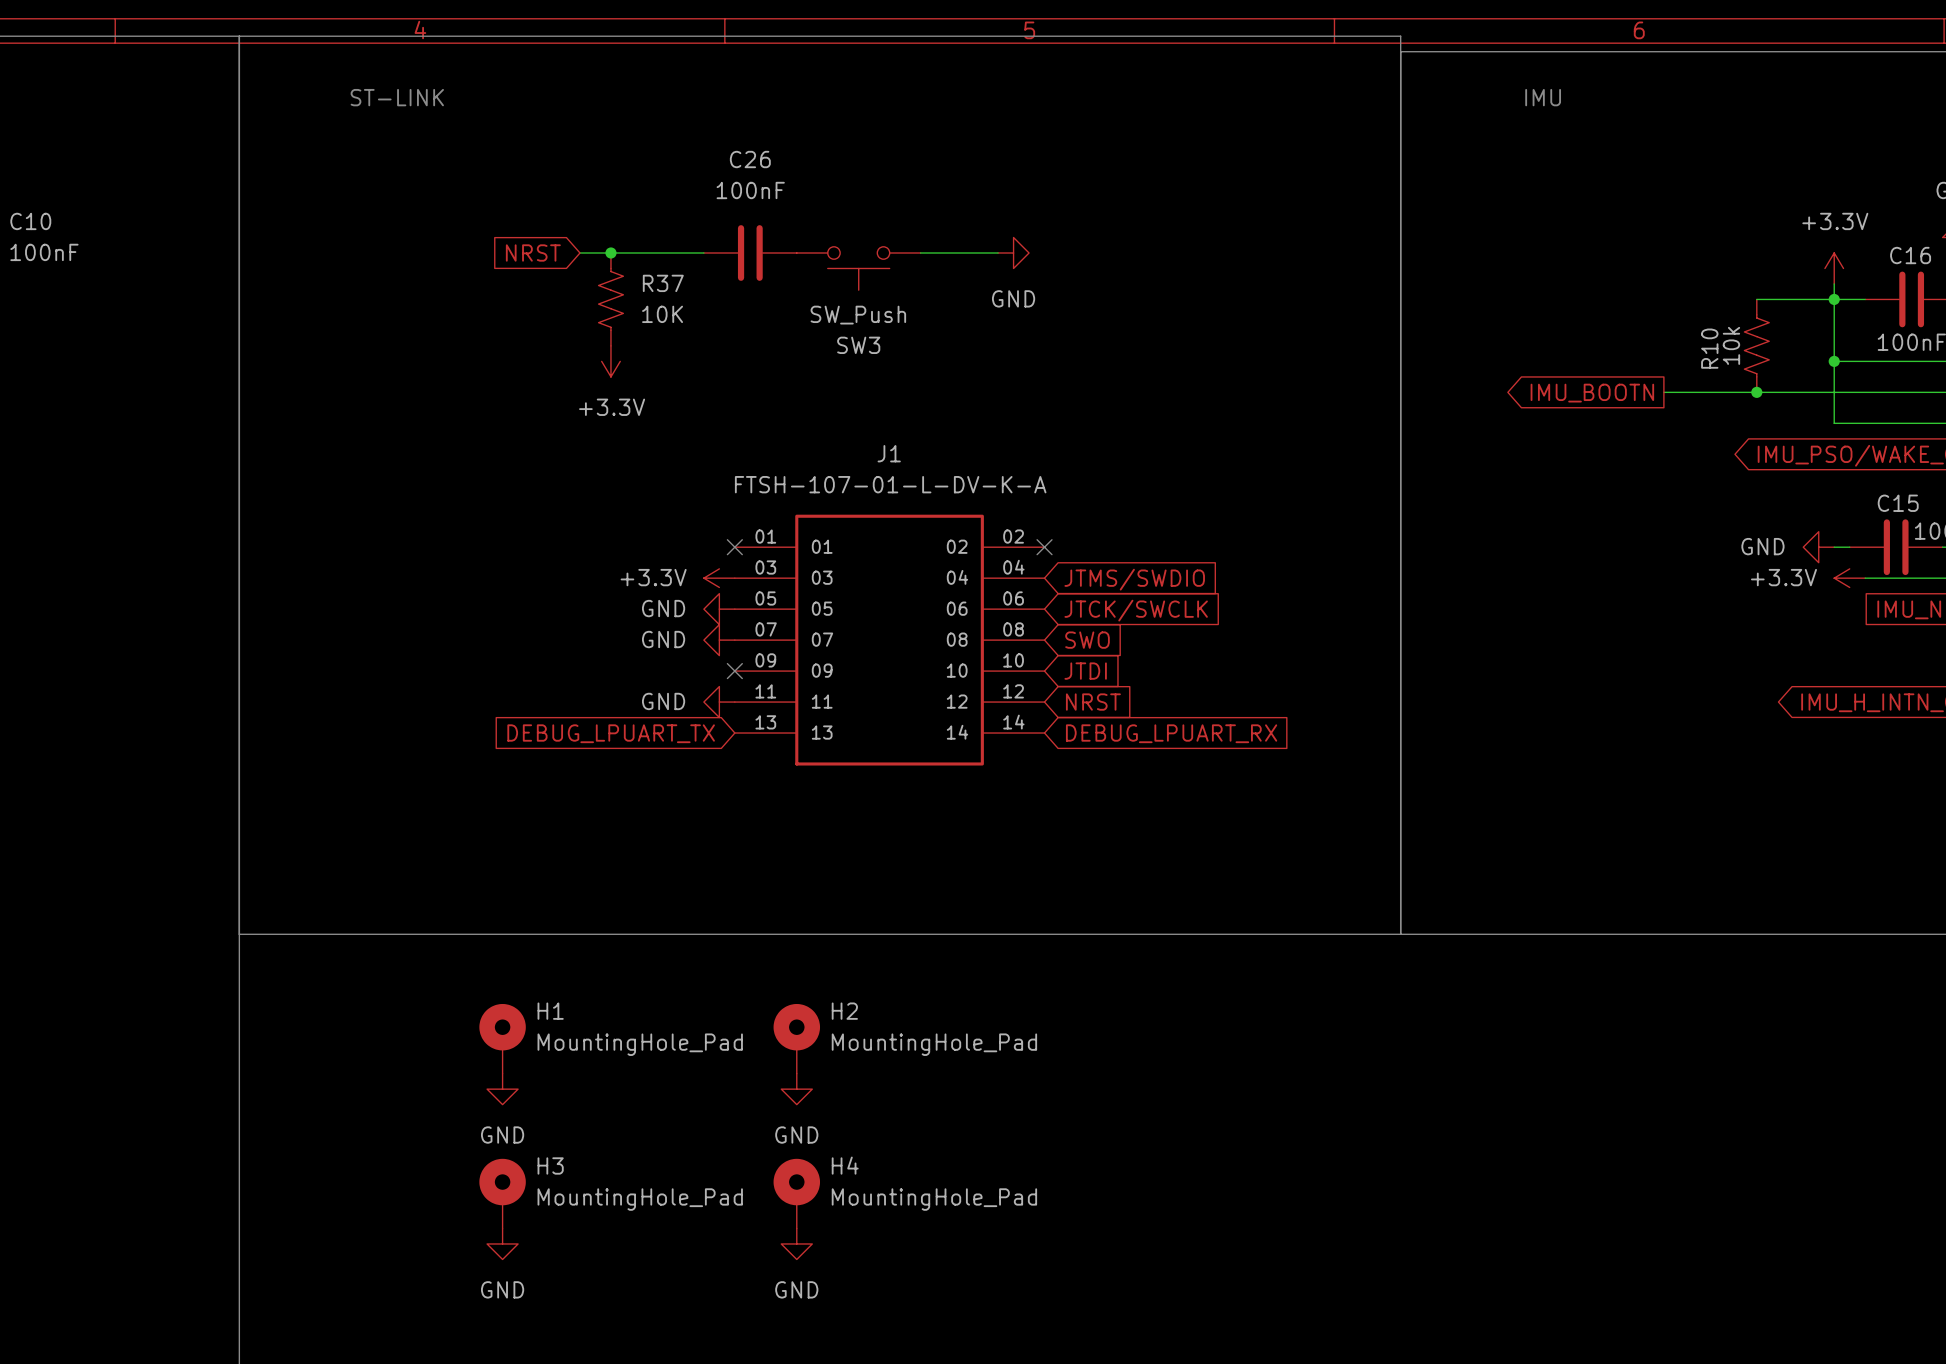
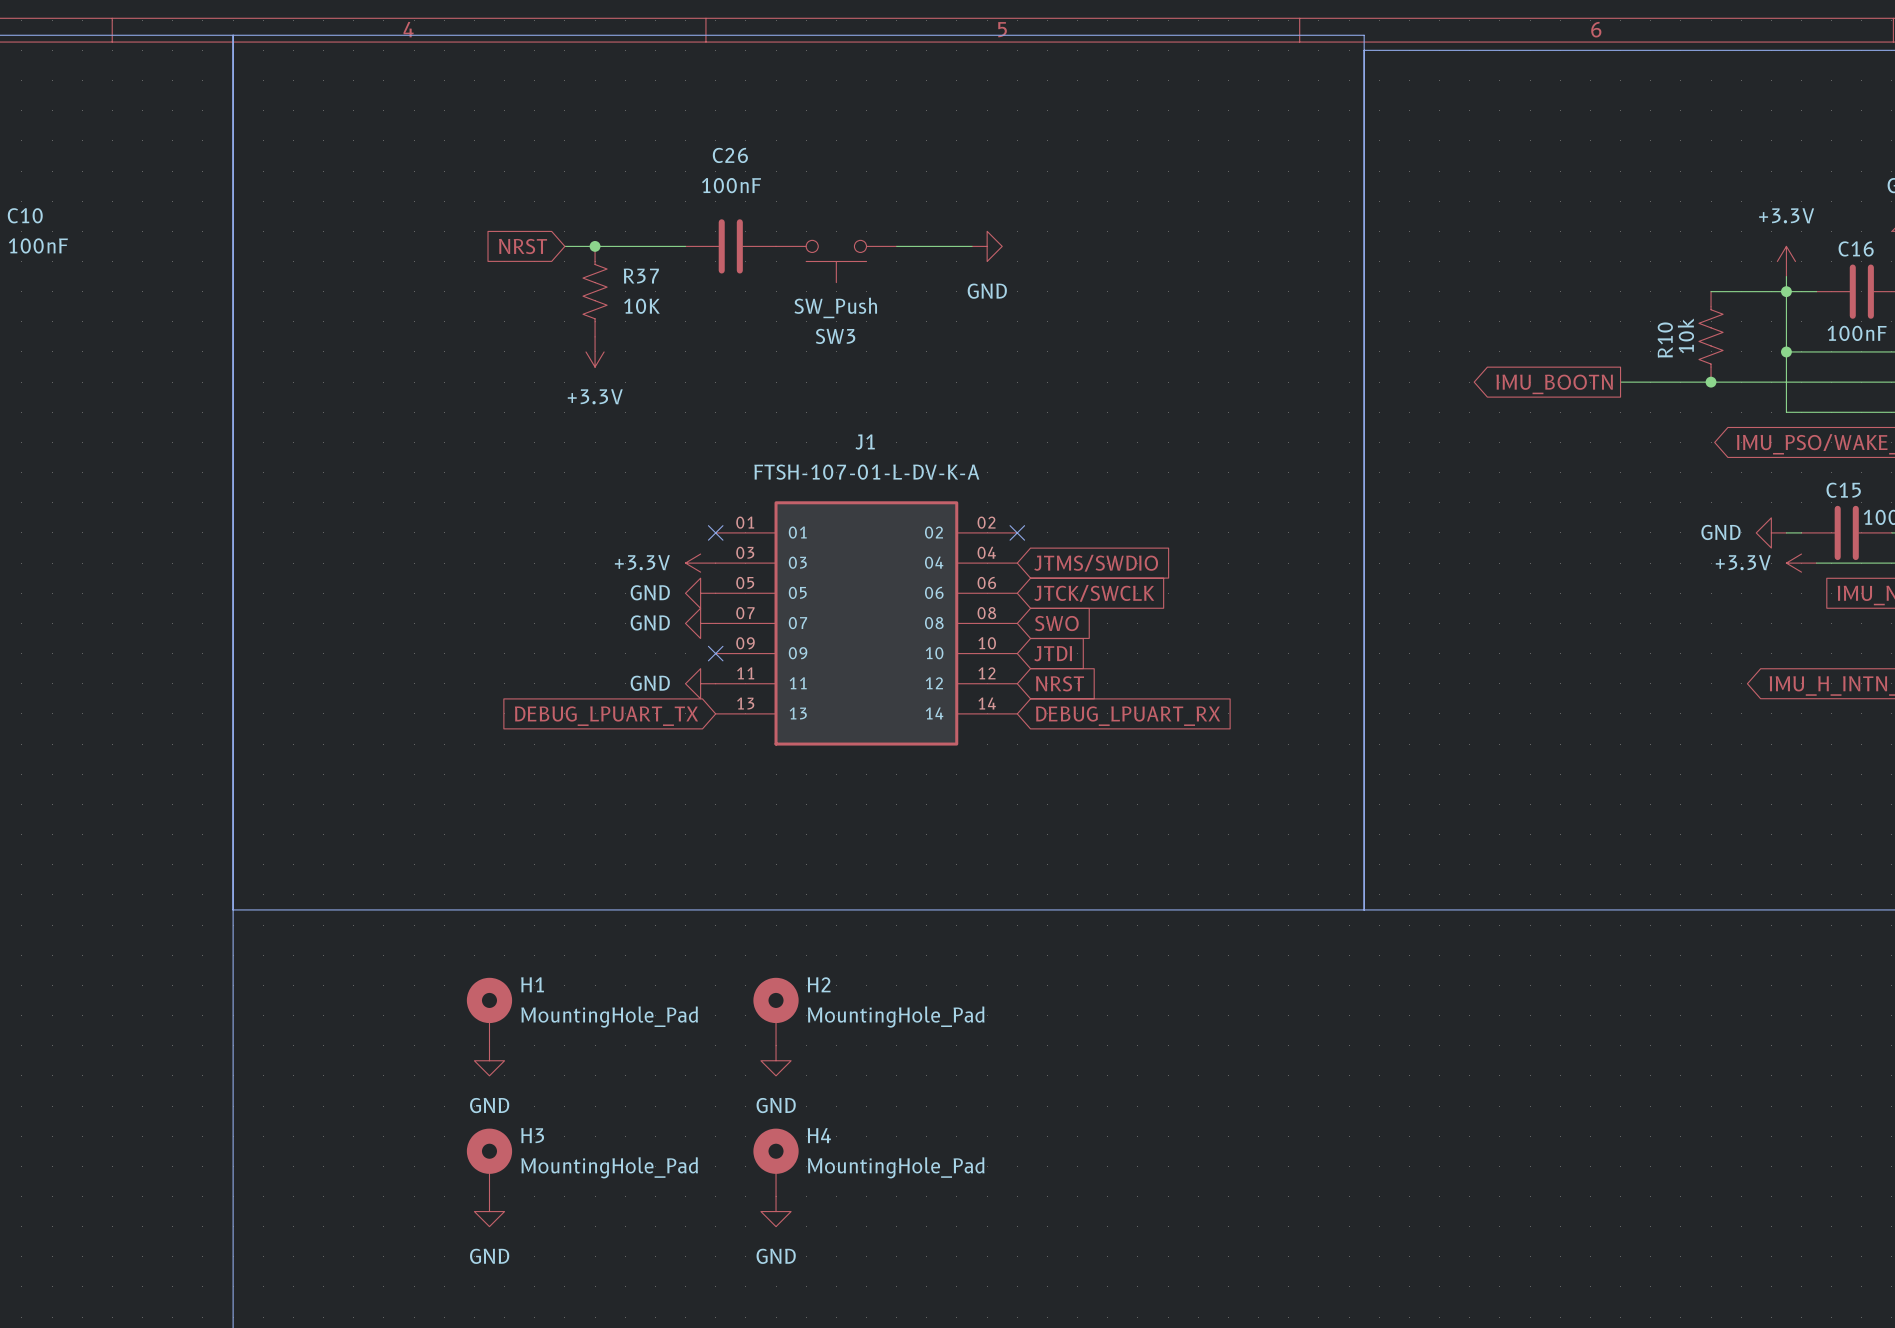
text: ST-LINK (397, 97) -> none
text: IMU (1543, 97) -> none

